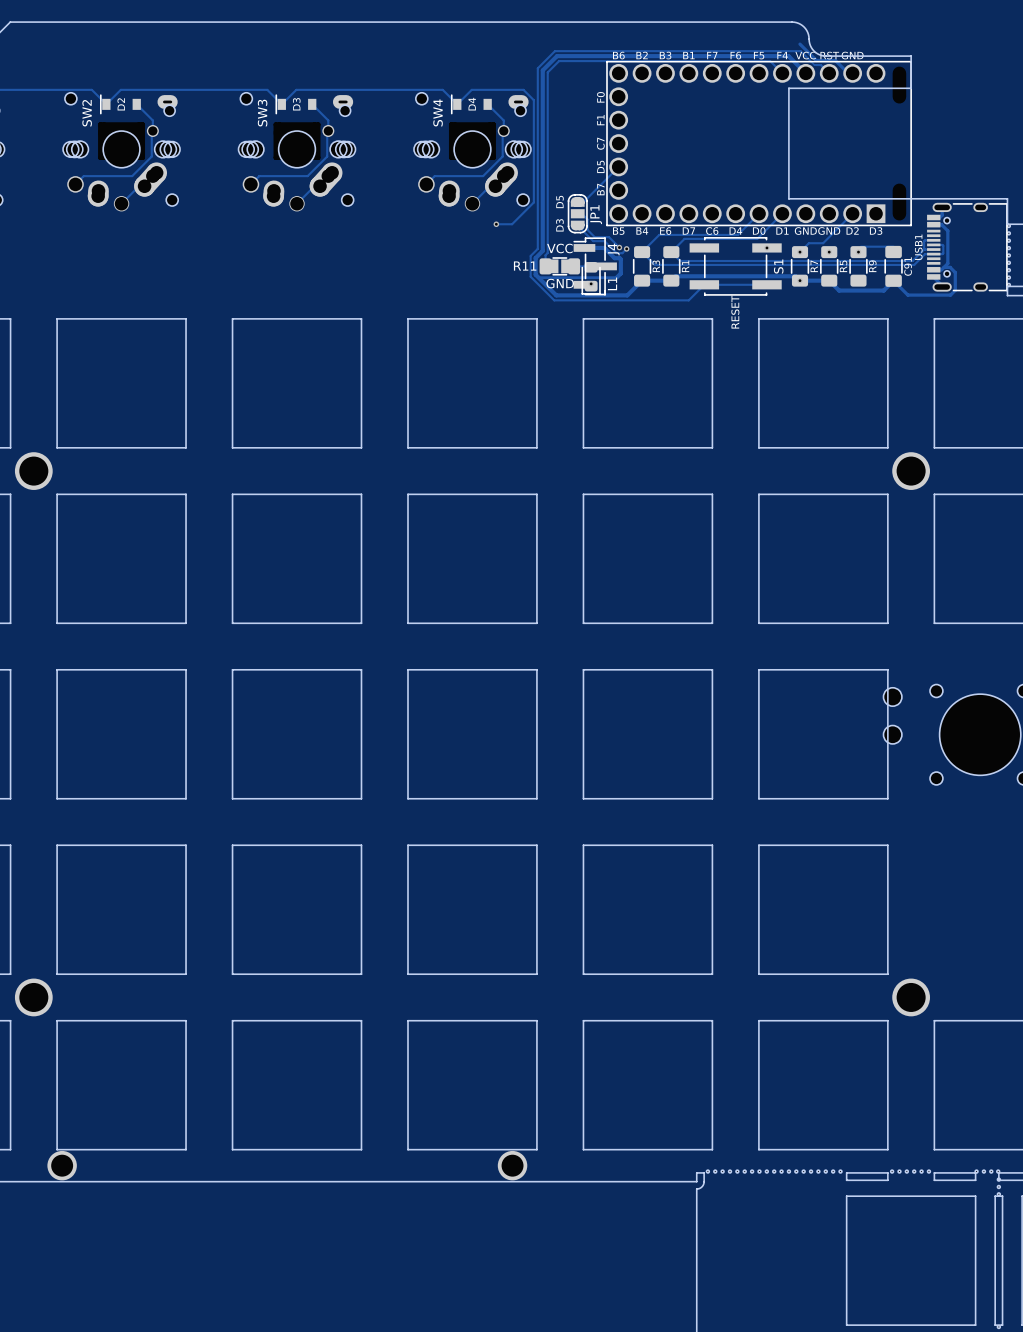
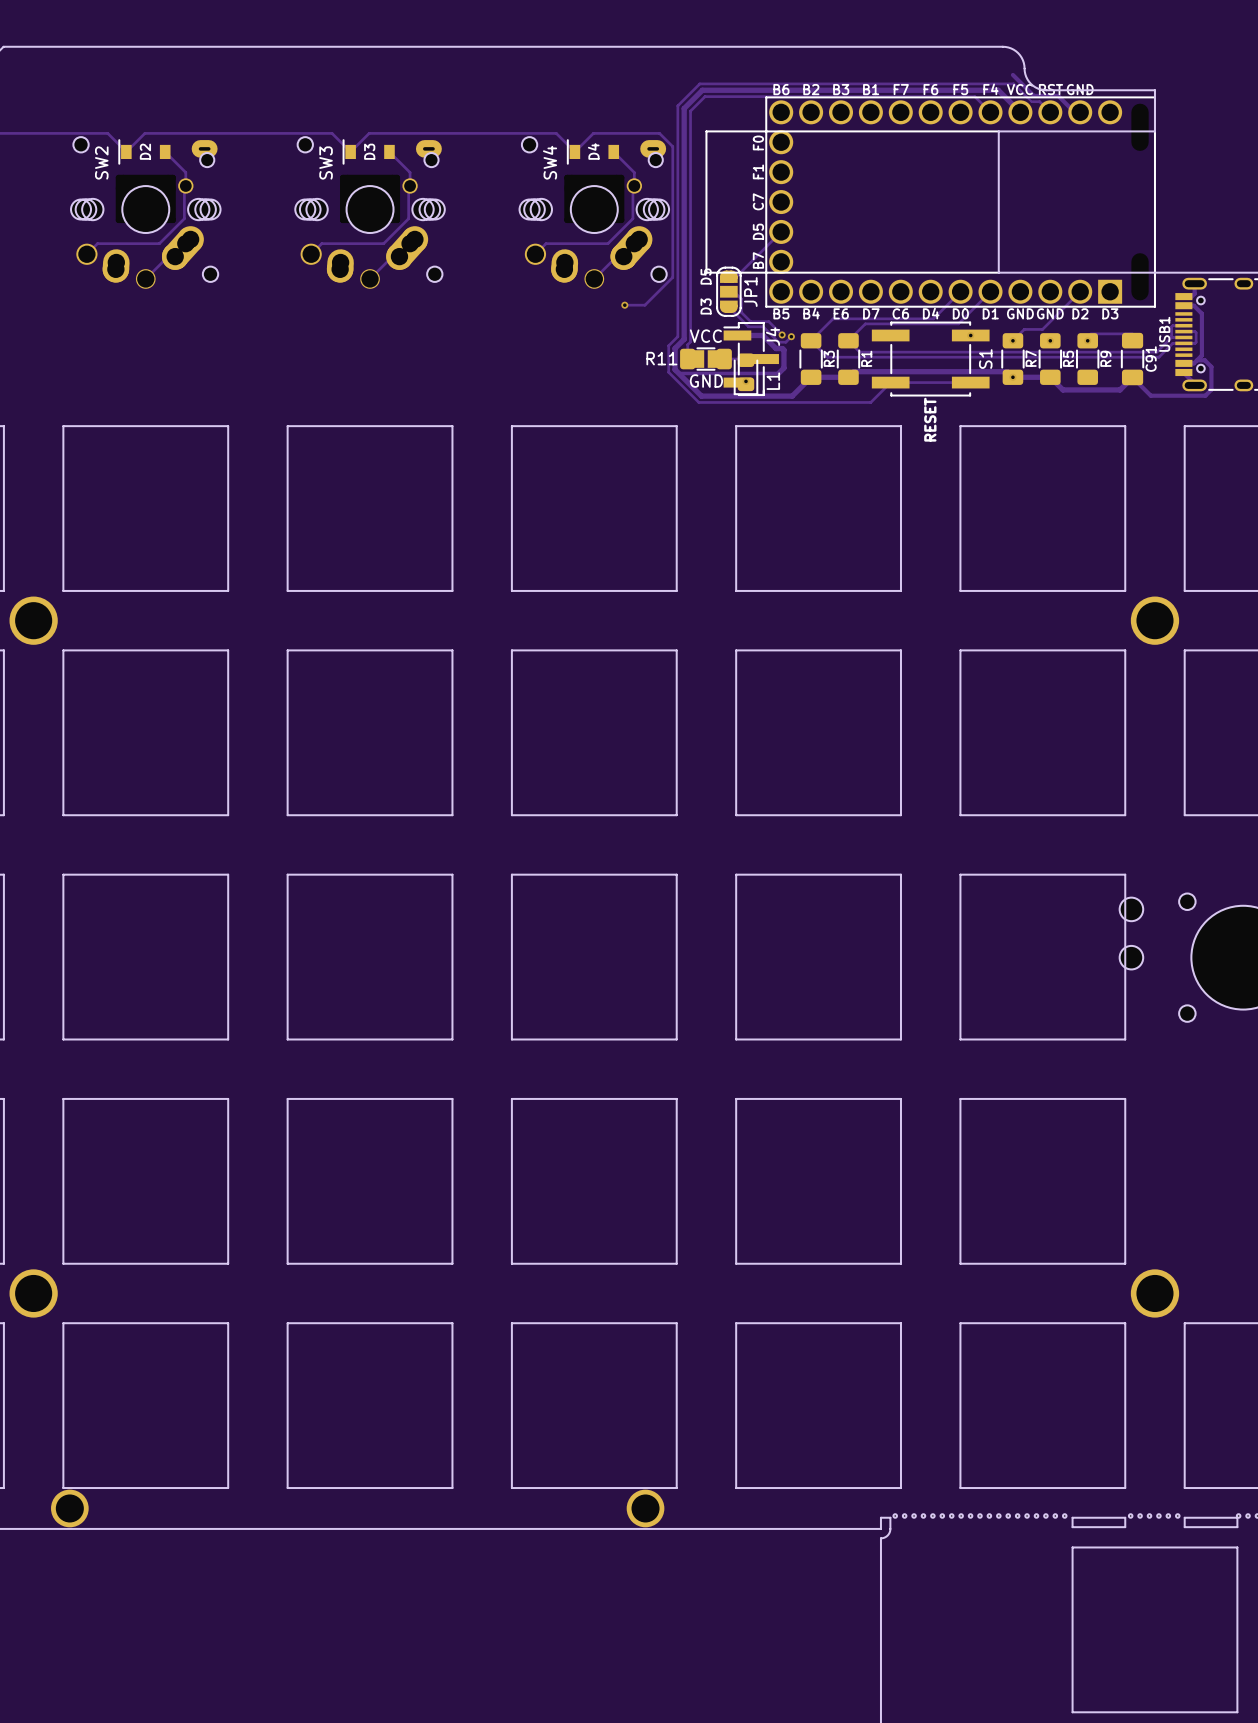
line: none -> (998, 131) (706, 131) (706, 272) (998, 272)

